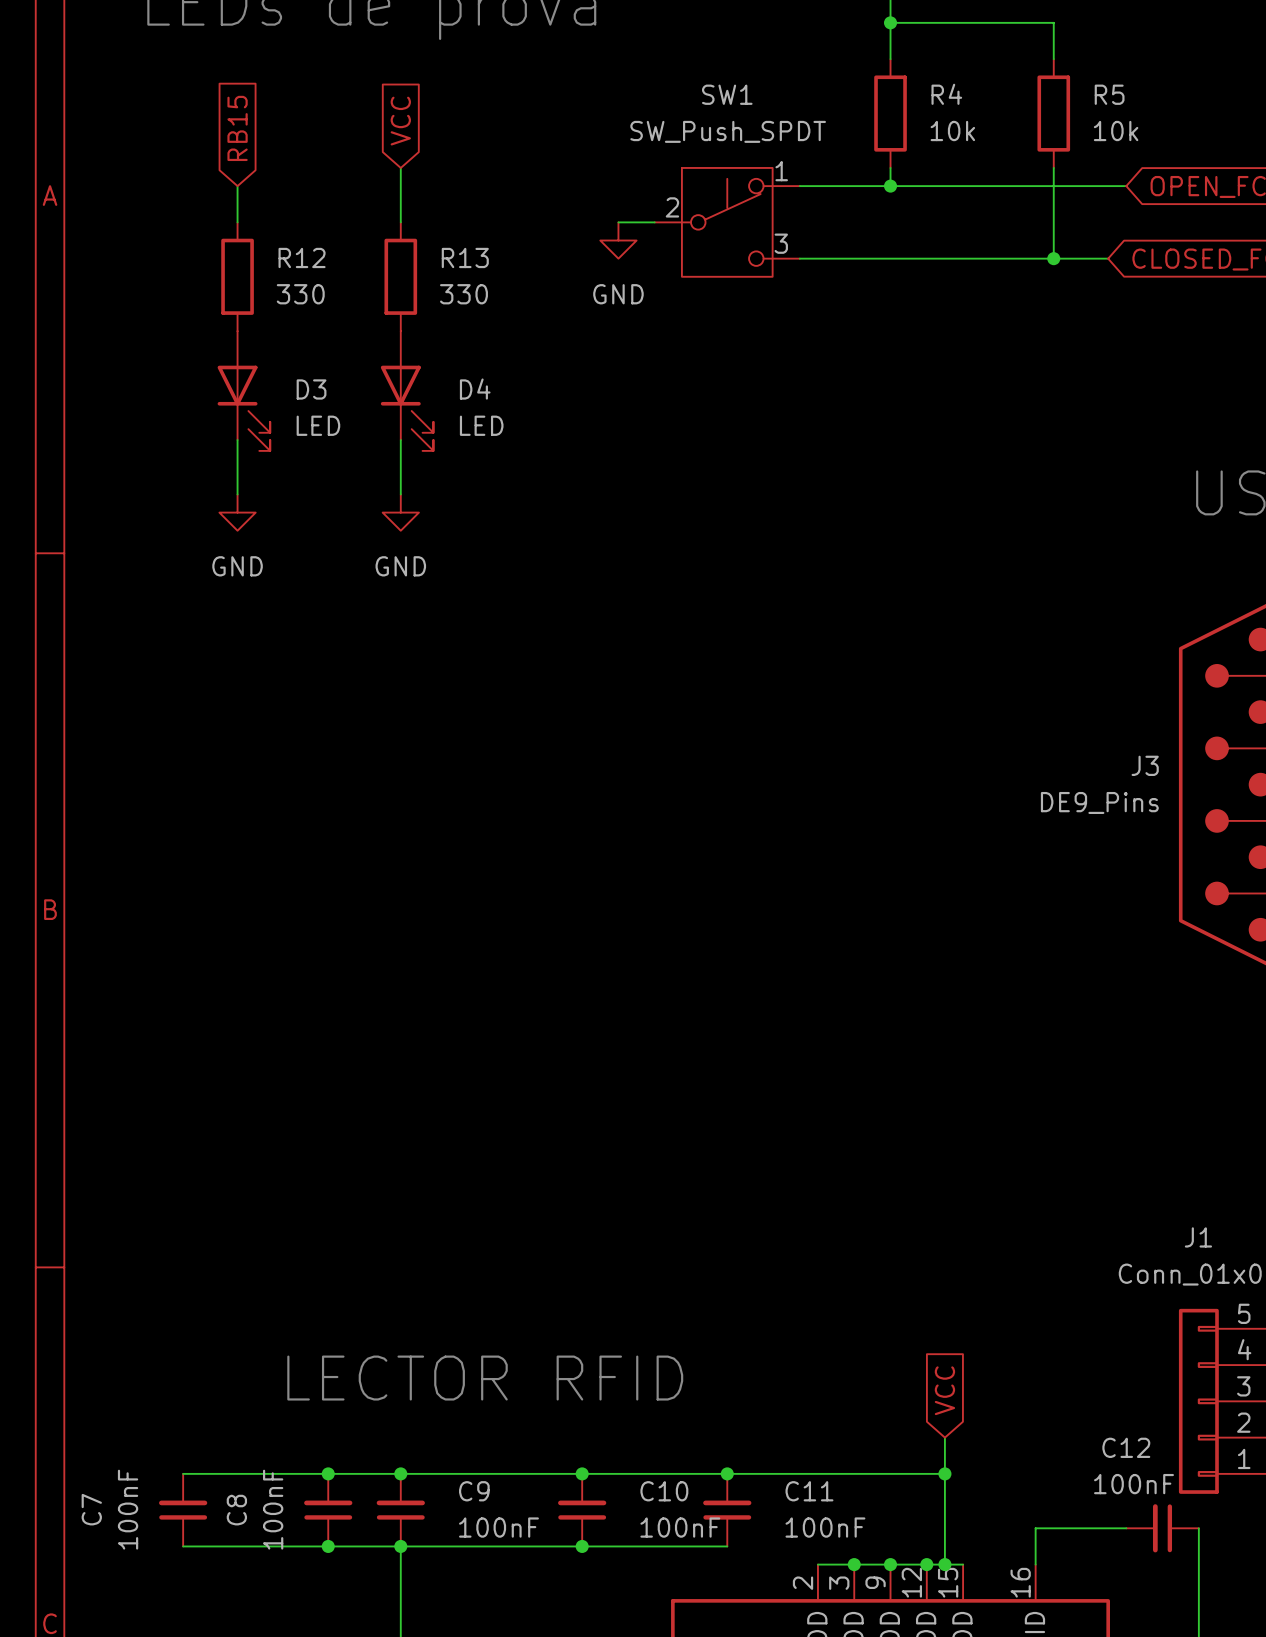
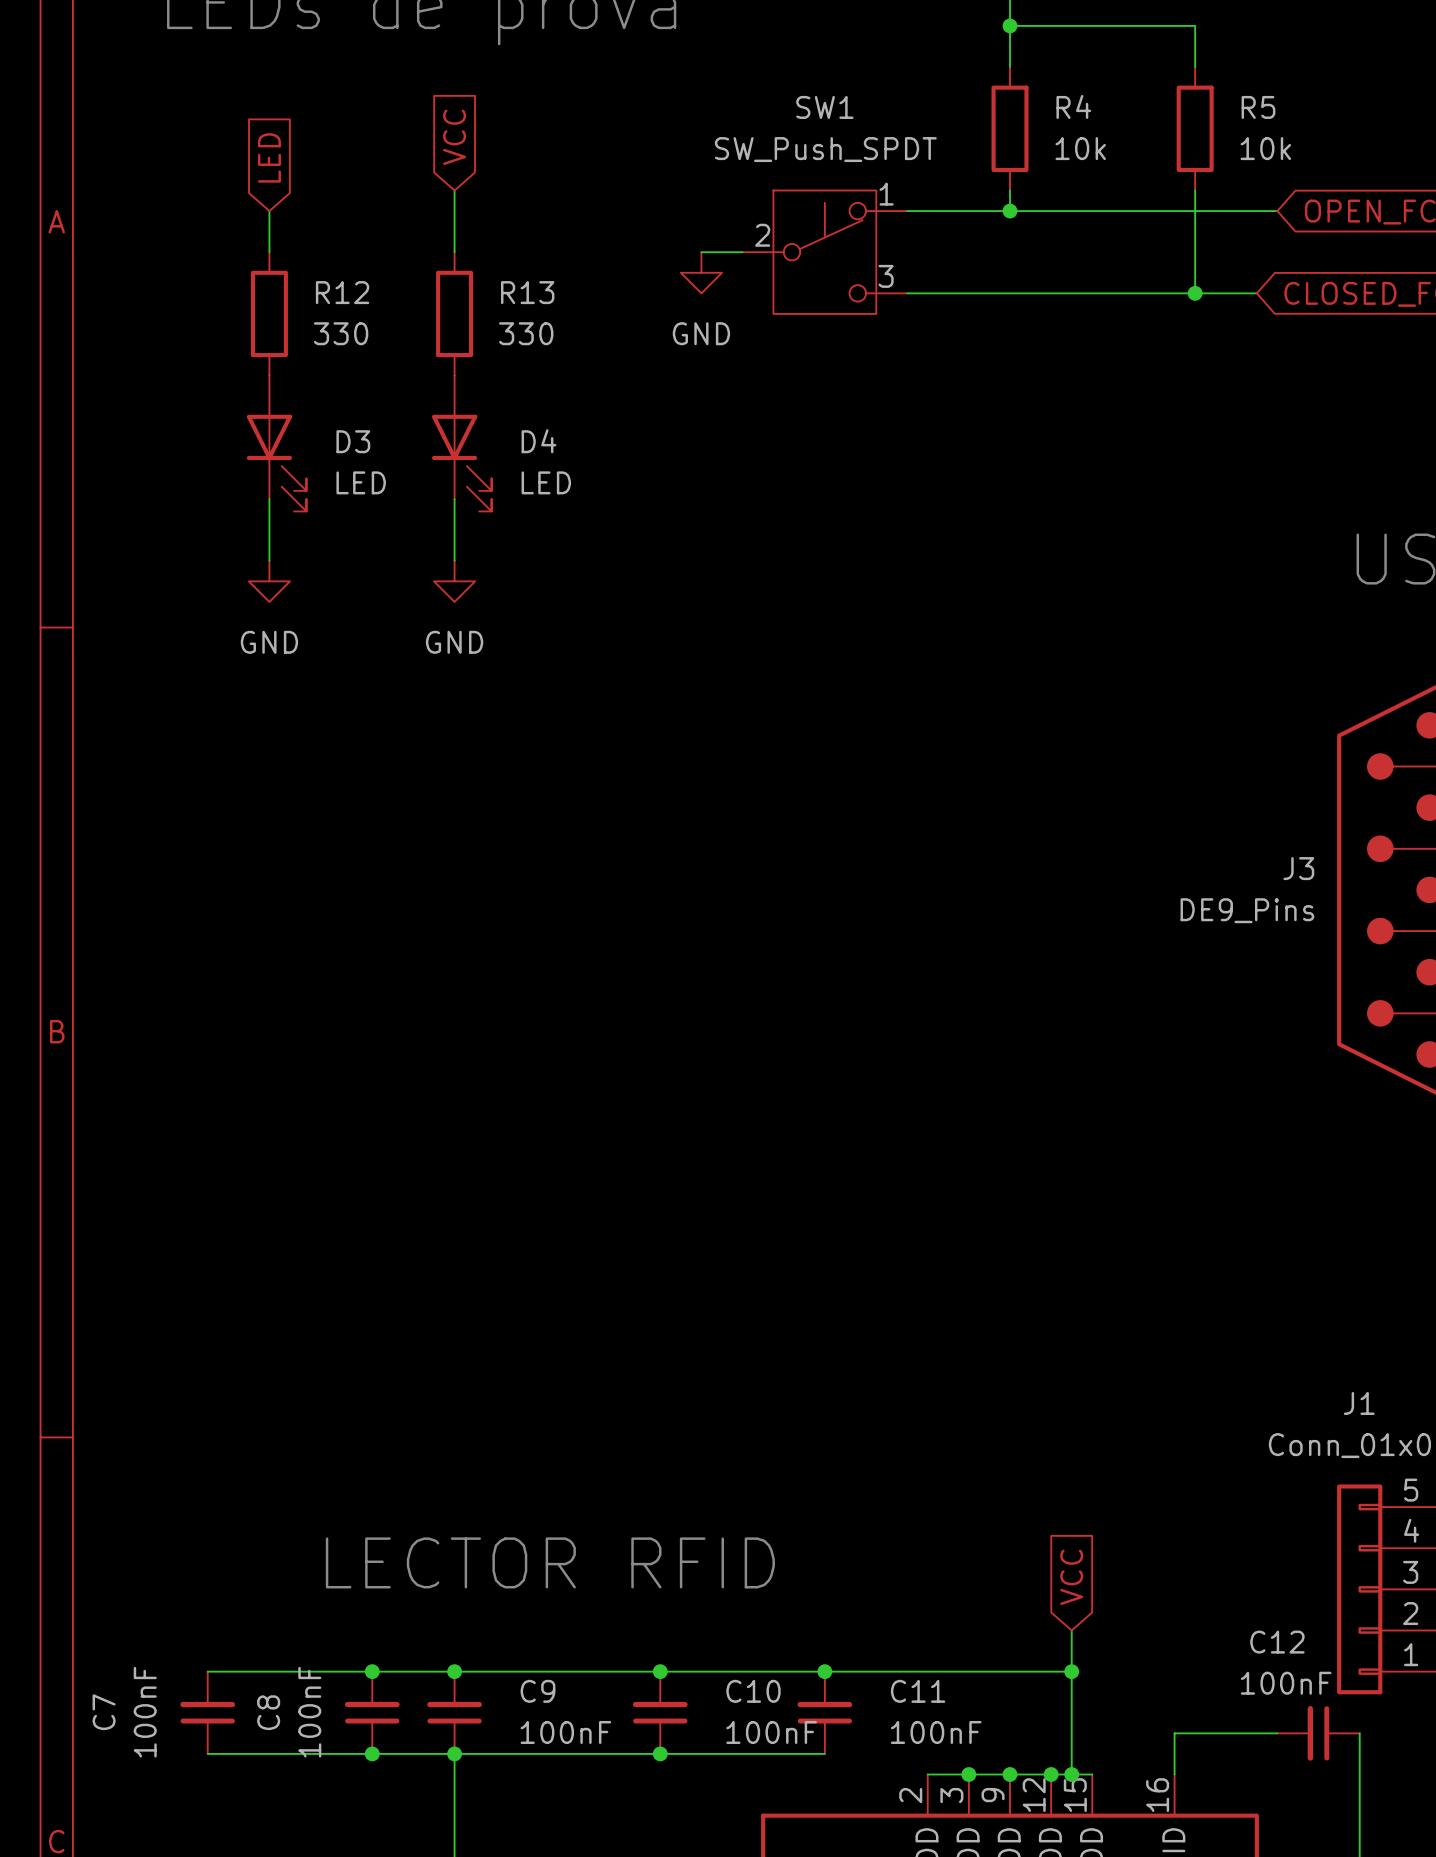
global label: RB15 (237, 128) -> LED (269, 157)

